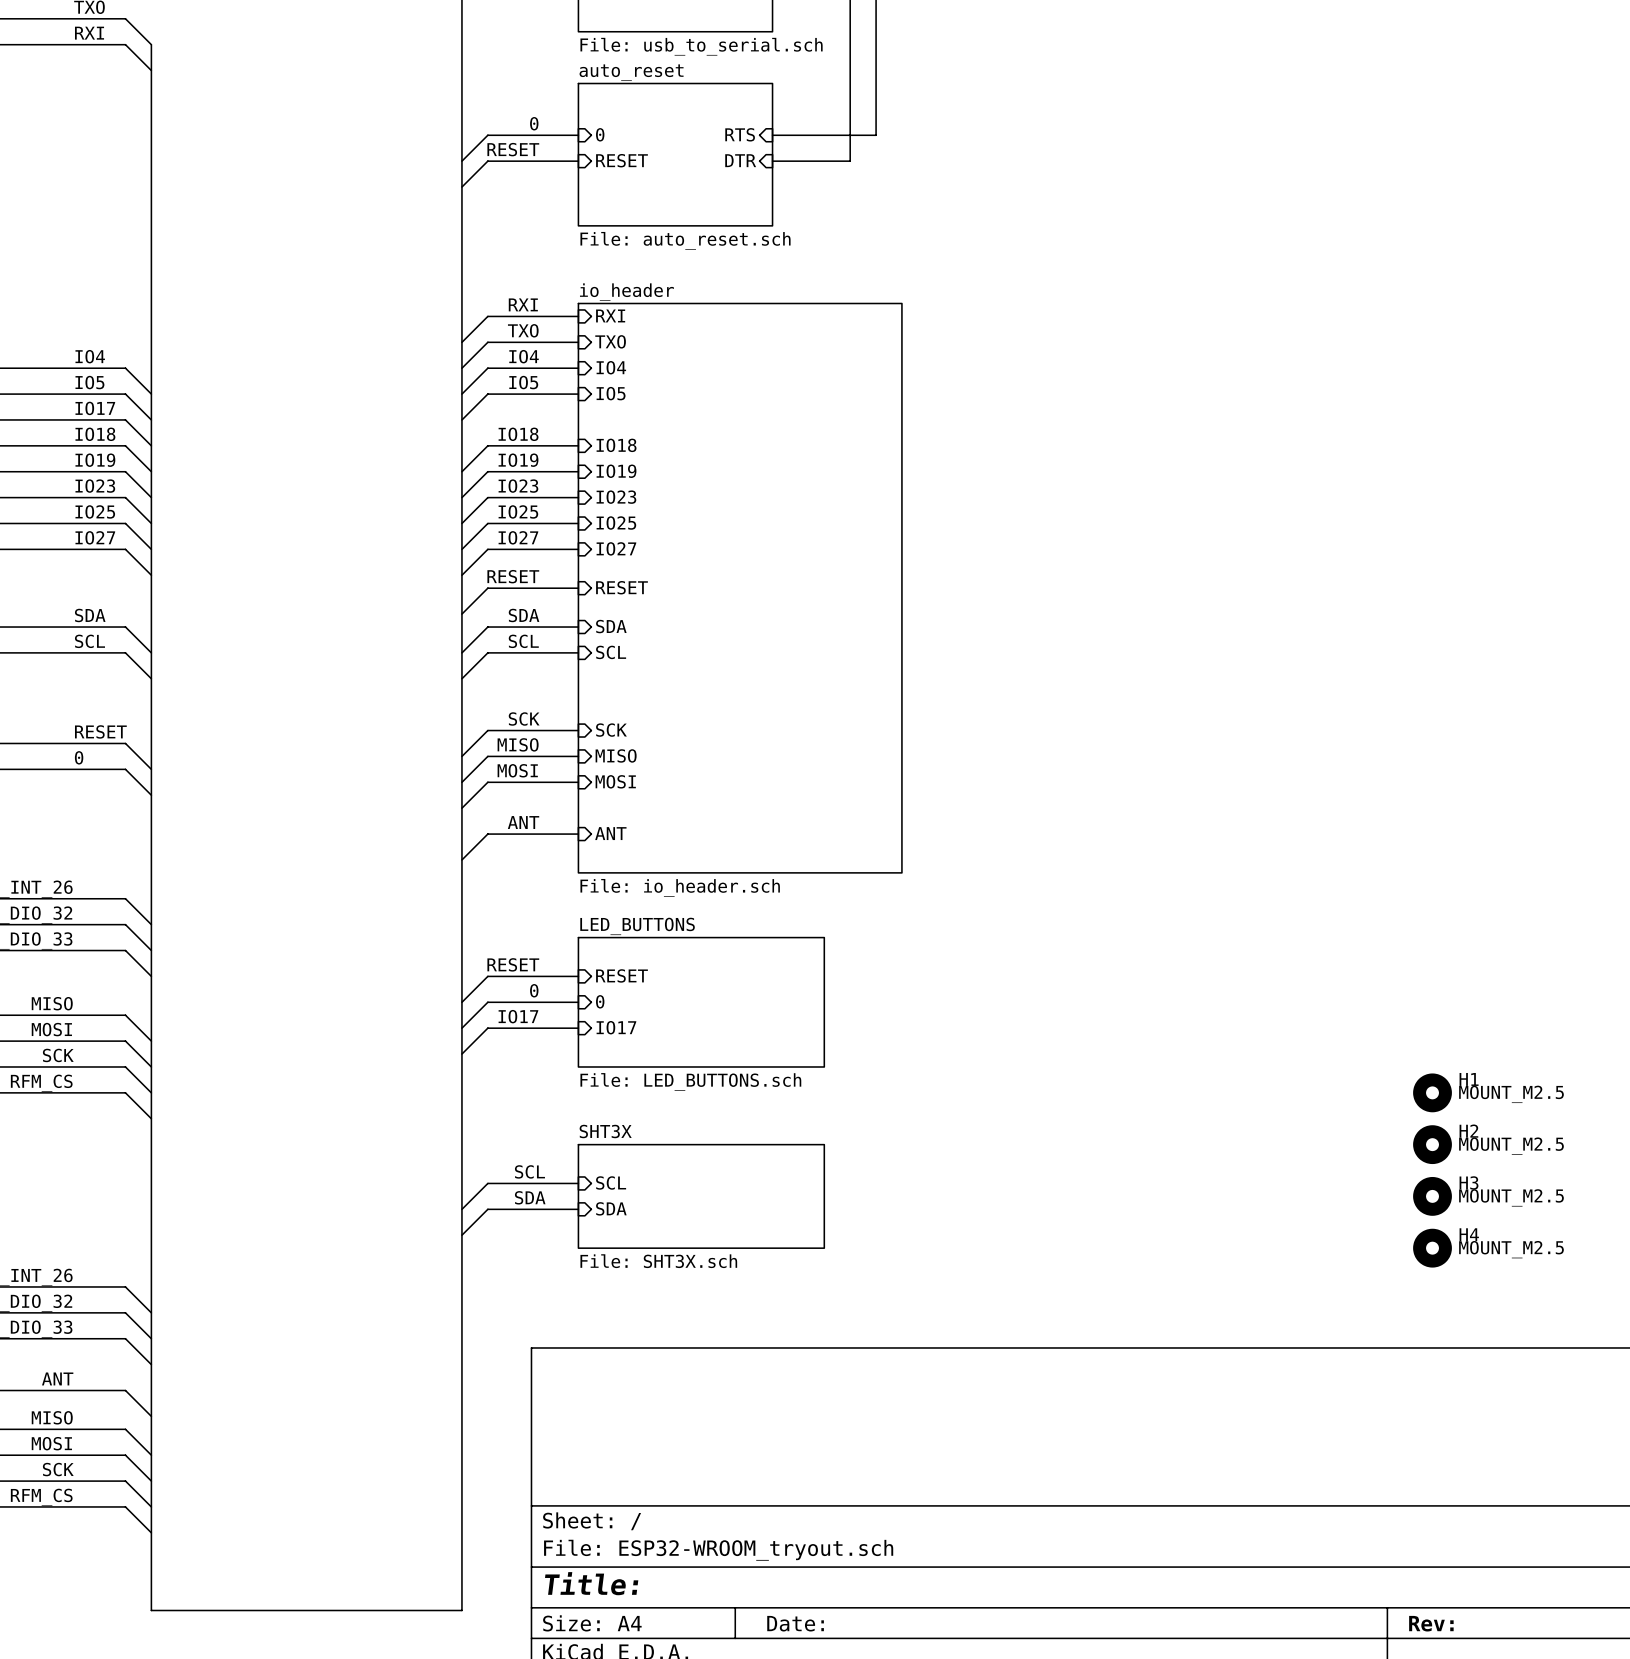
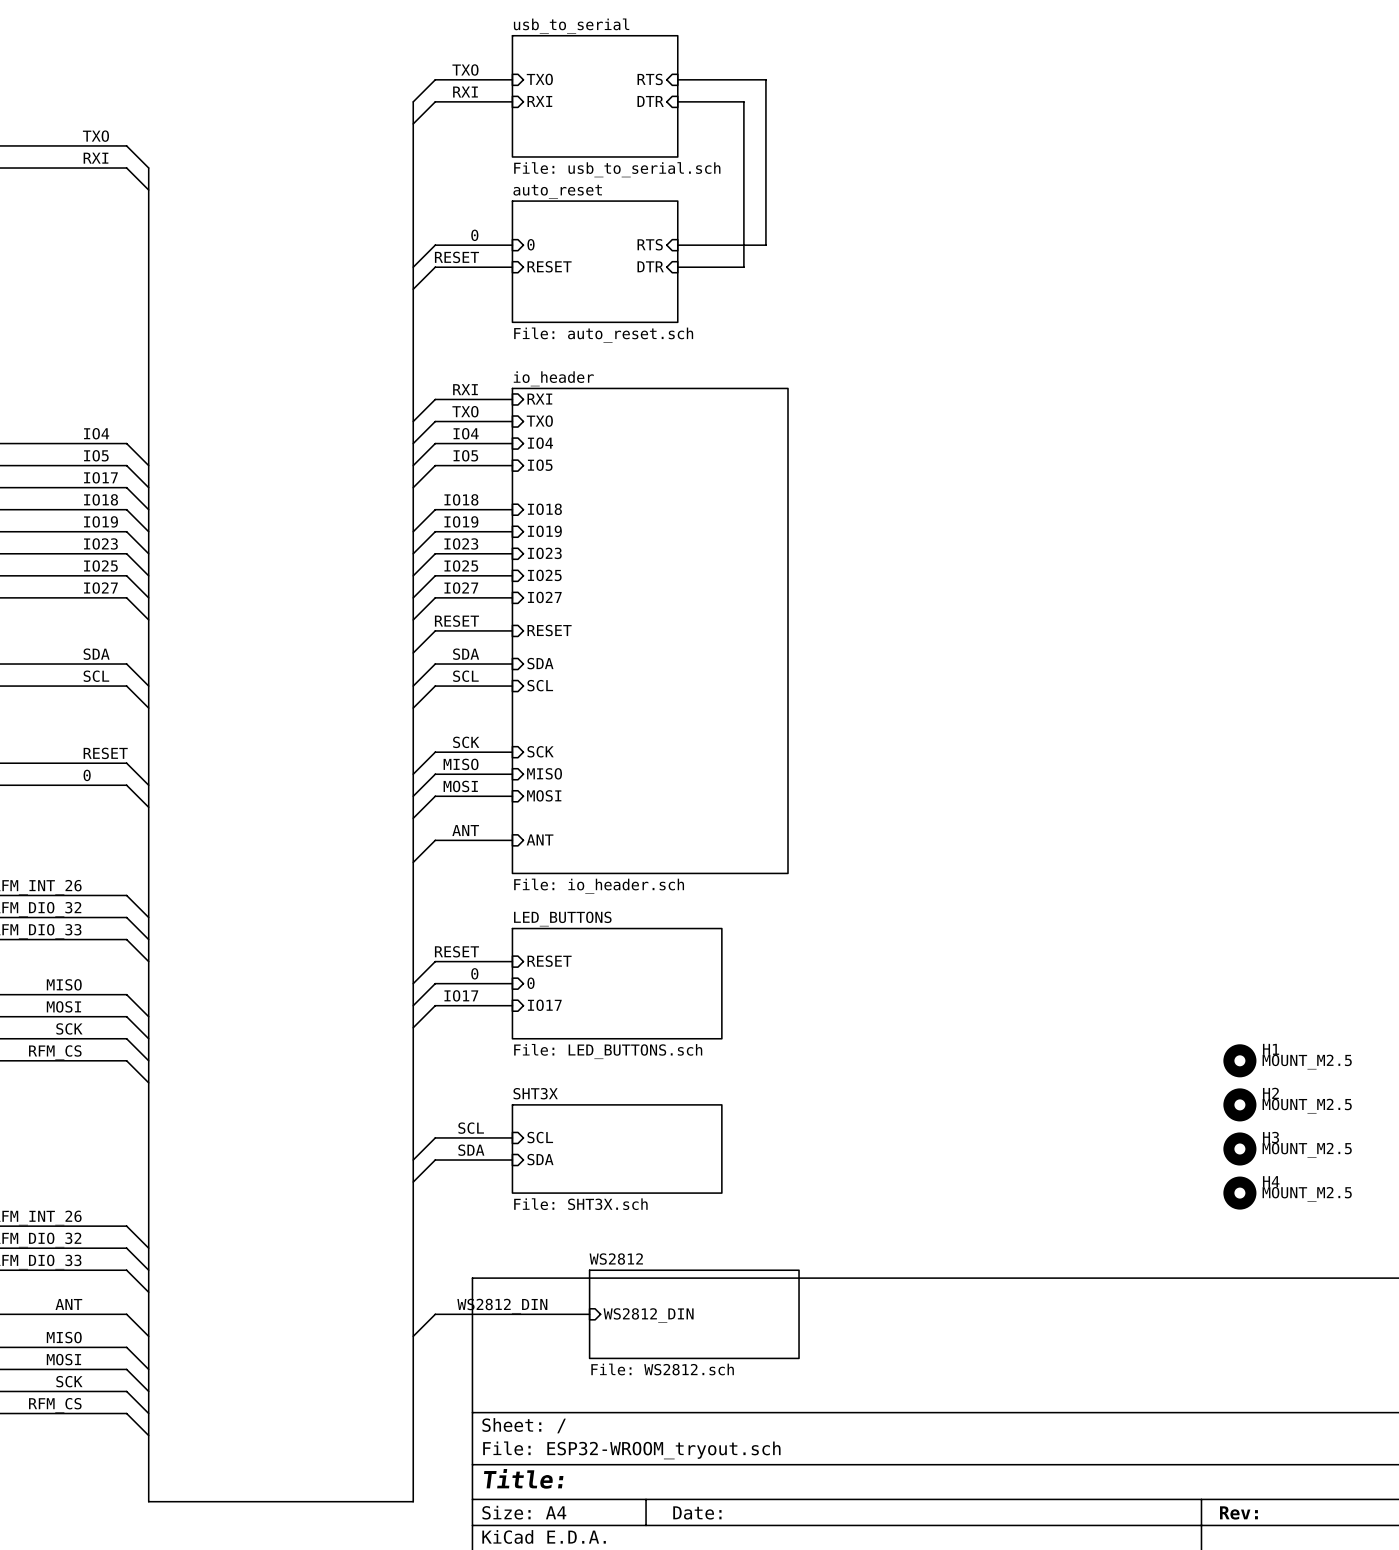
label: none -> WS2812_DIN (502, 1306)
wire: none -> (589, 1314) (435, 1314) (413, 1336)
sheet WS2812: none -> File: WS2812.sch (694, 1314)
sheet pin: none -> WS2812_DIN (648, 1315)

